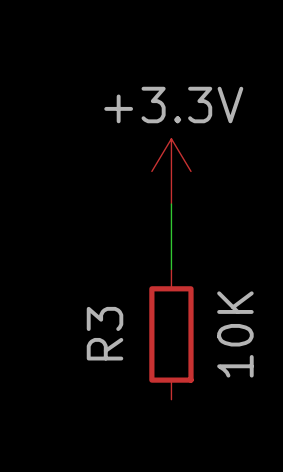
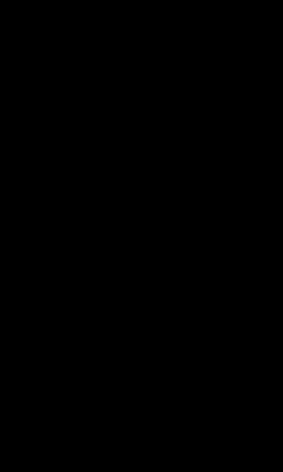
power symbol: +3.3V (171, 171) -> none
wire: (171, 204) (171, 269) -> none
R3: 10K (171, 334) -> none

